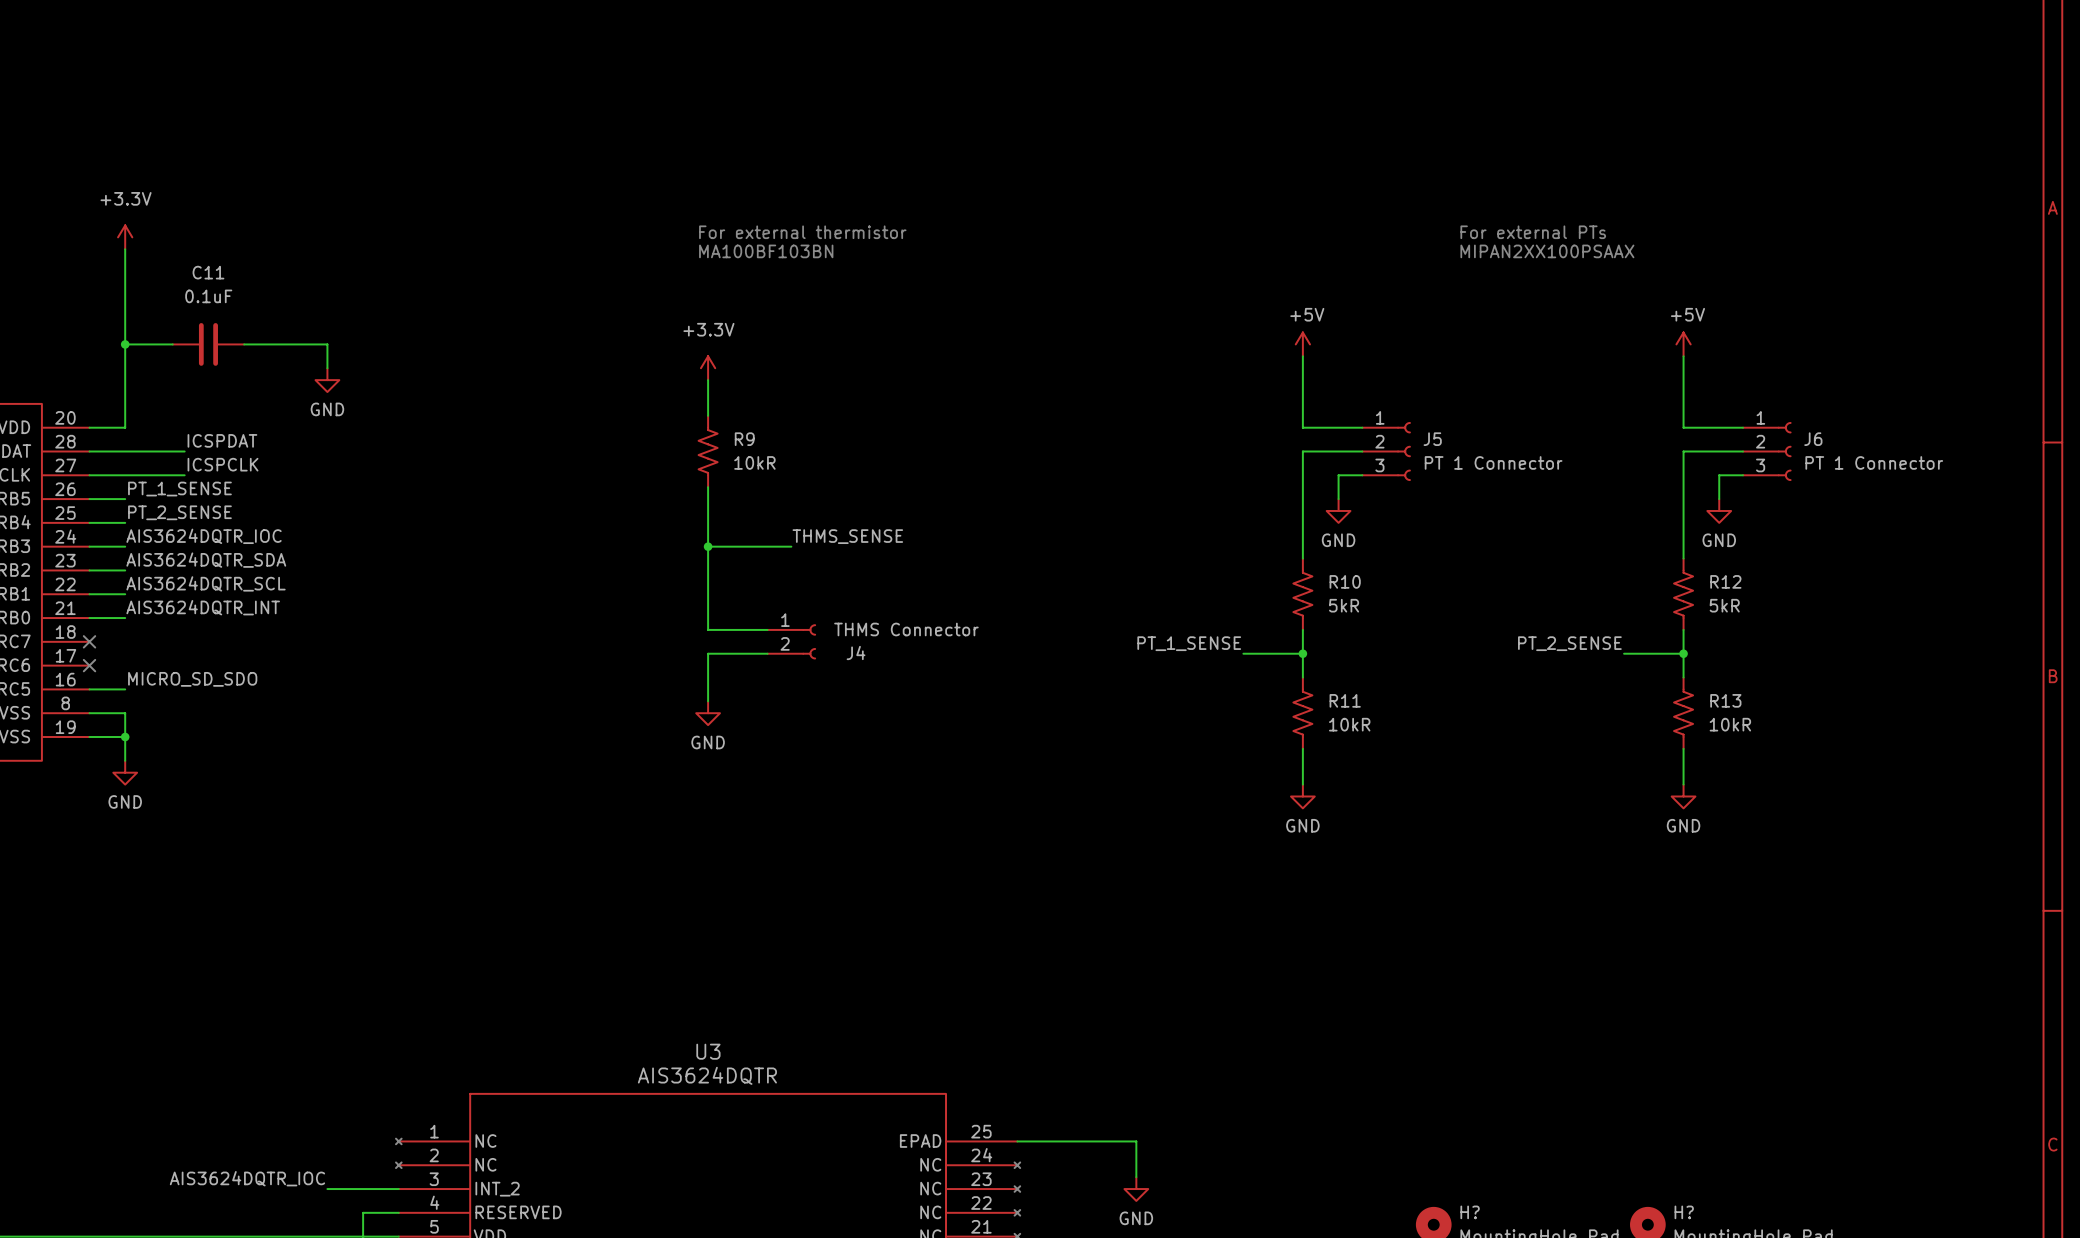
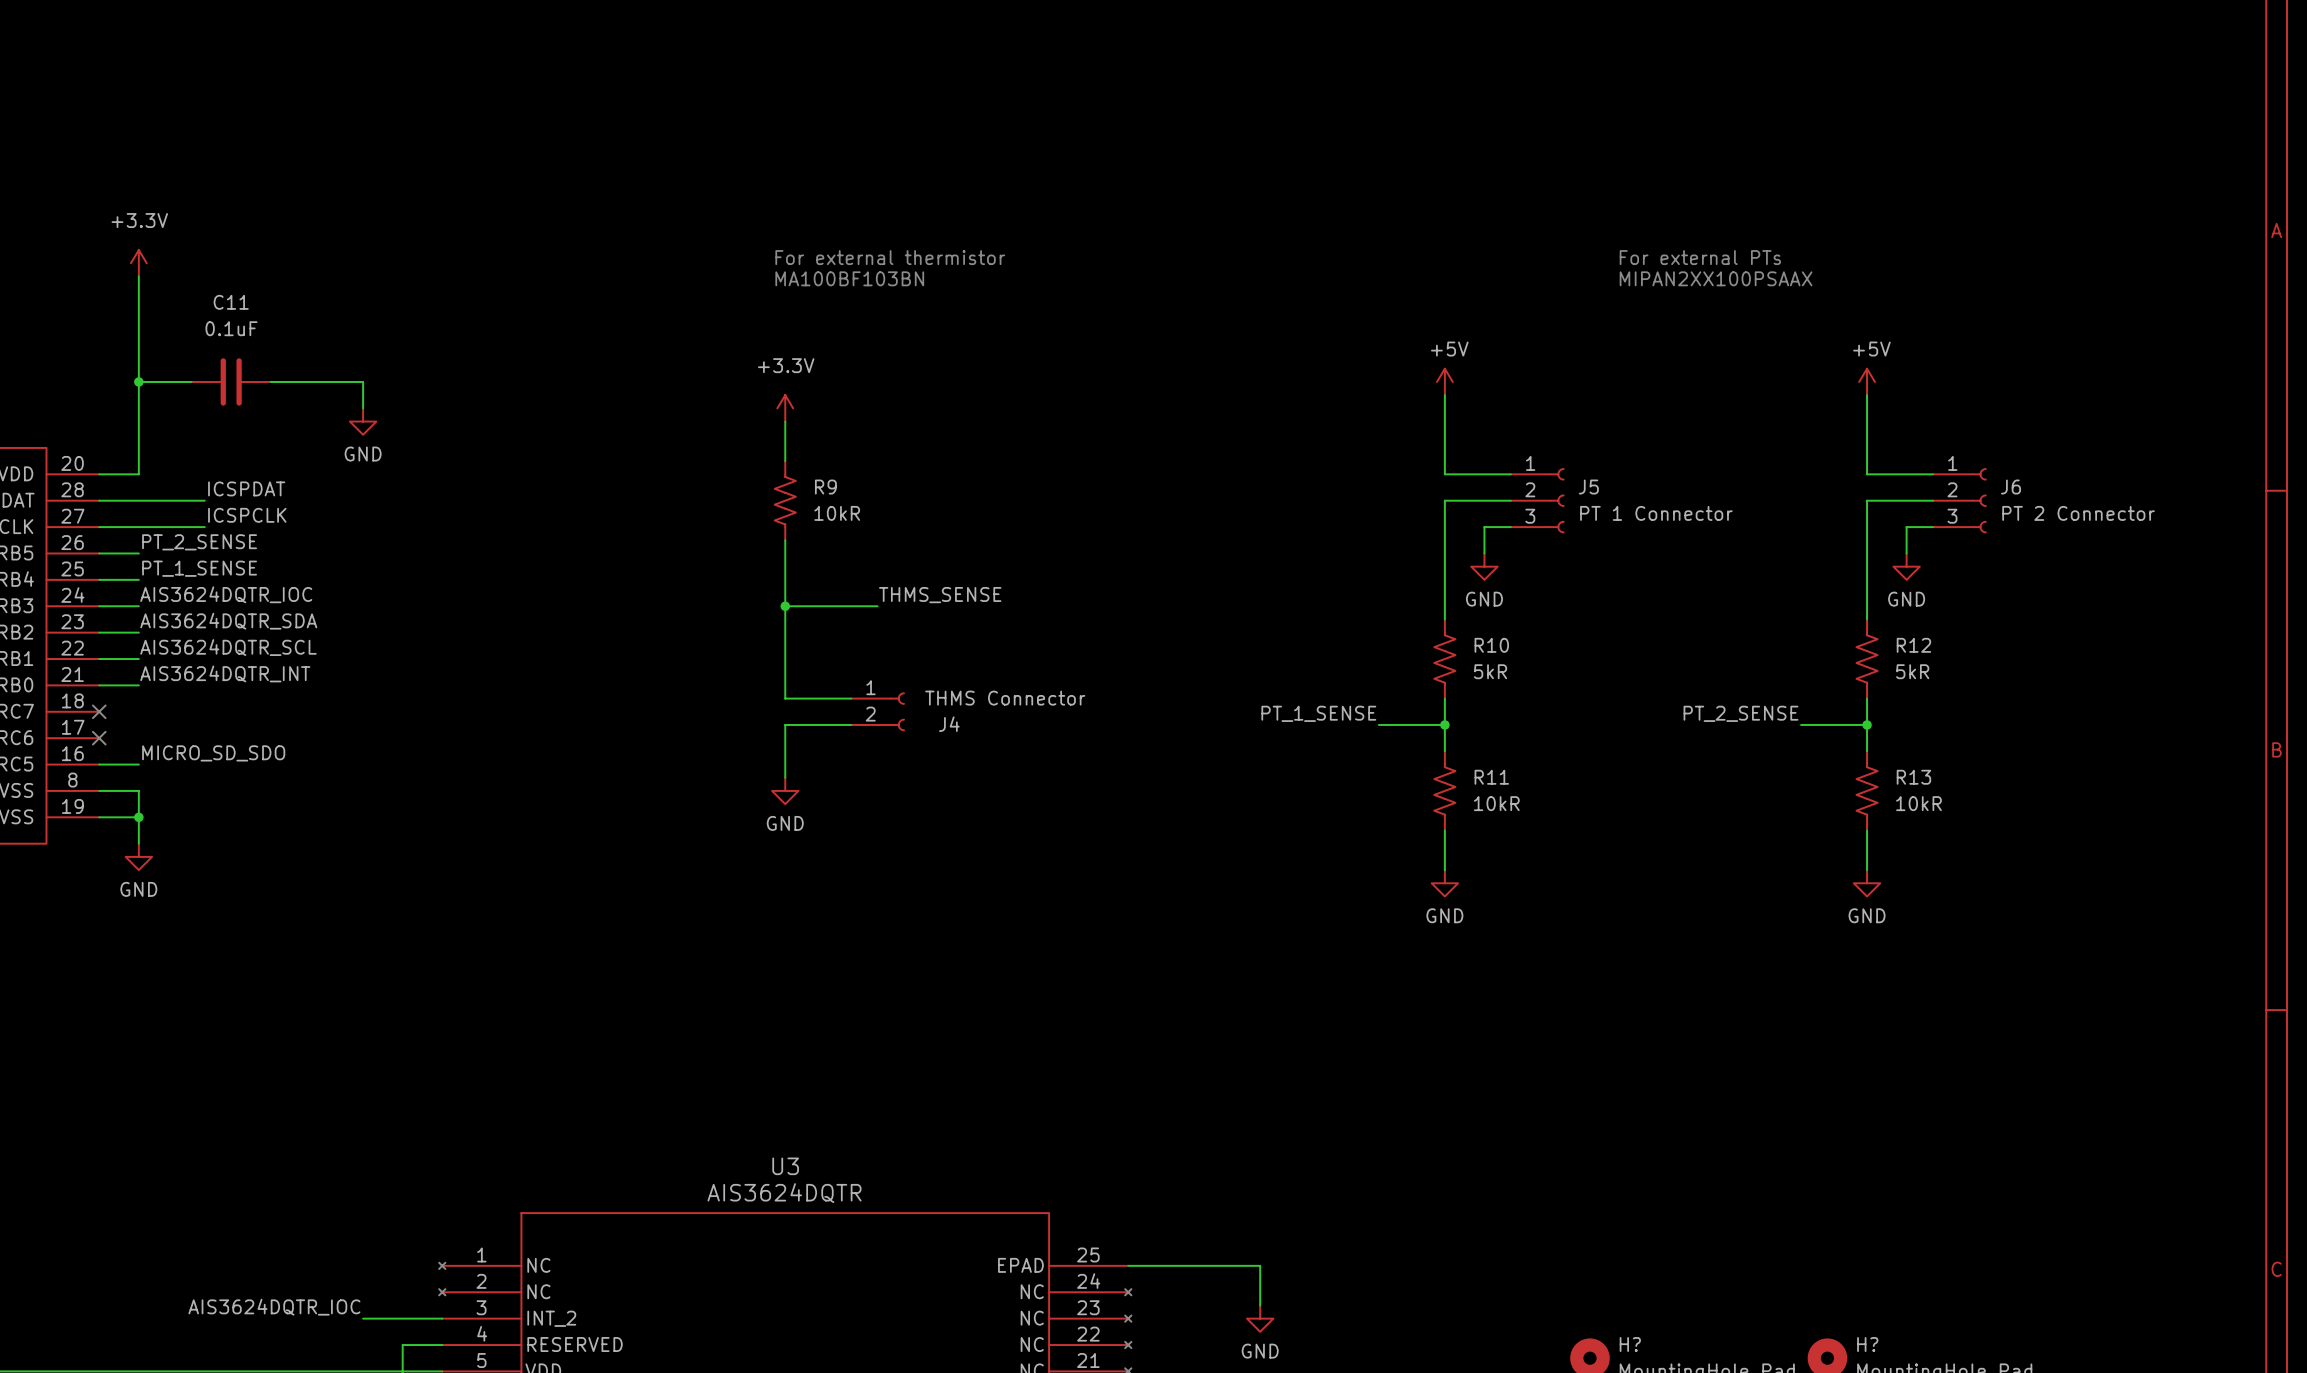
J6 value: PT 1 Connector (1874, 462) -> PT 2 Connector (2078, 513)
label: PT_1_SENSE (179, 489) -> PT_2_SENSE (199, 542)
label: PT_2_SENSE (179, 512) -> PT_1_SENSE (199, 568)

